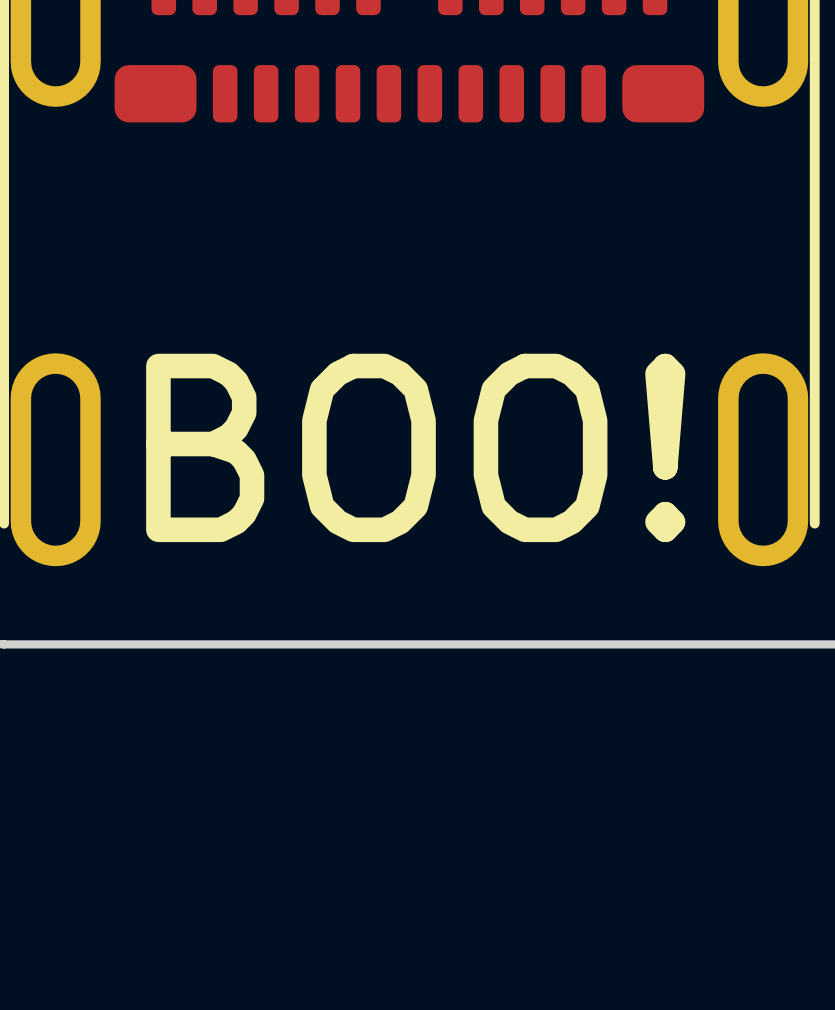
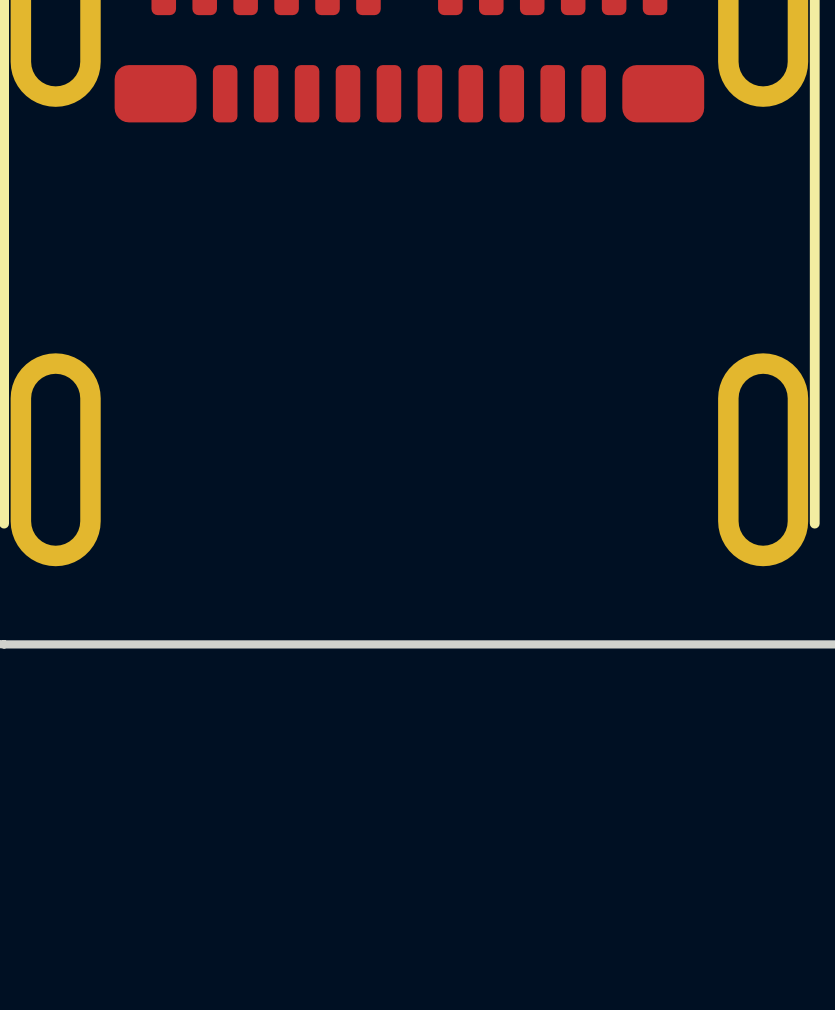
text: BOO! (415, 447) -> none

